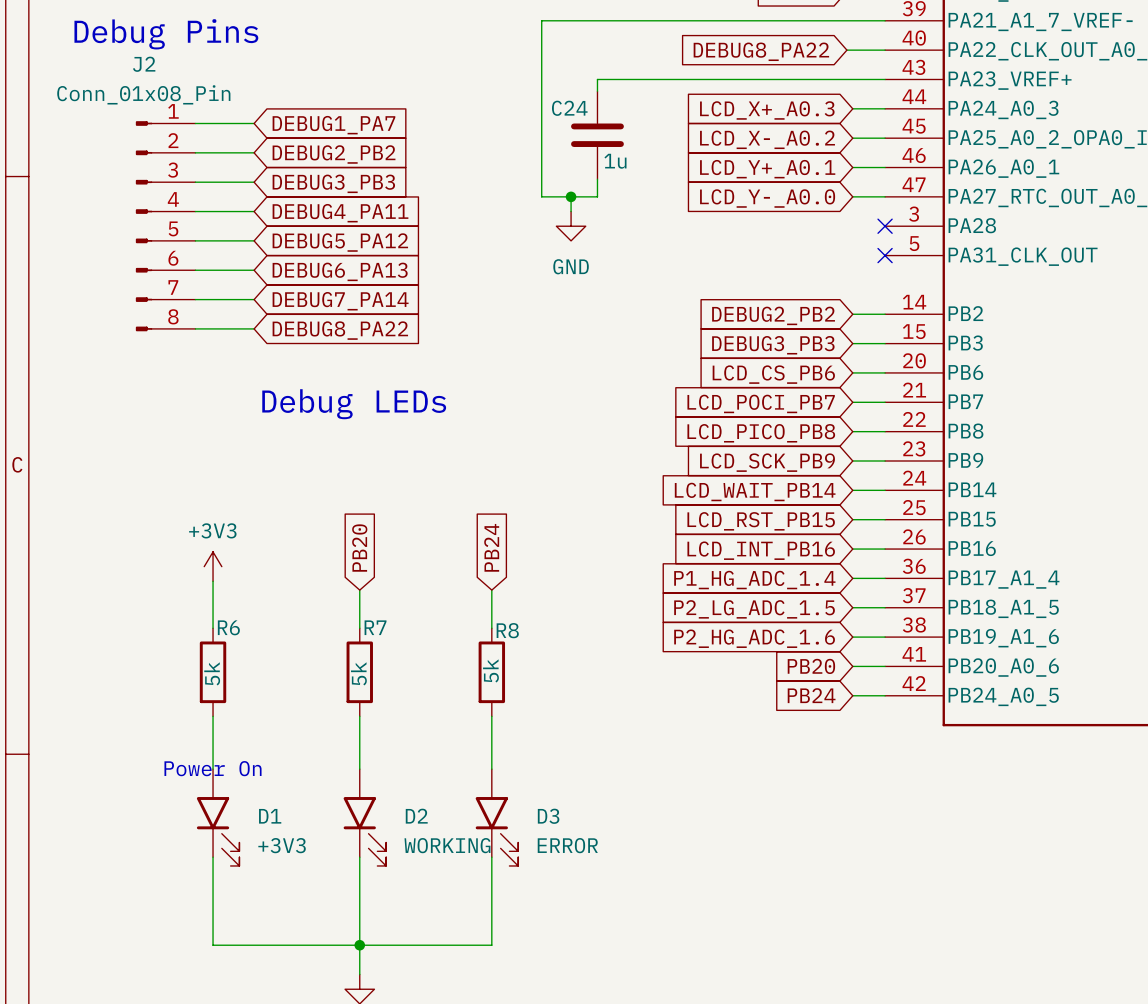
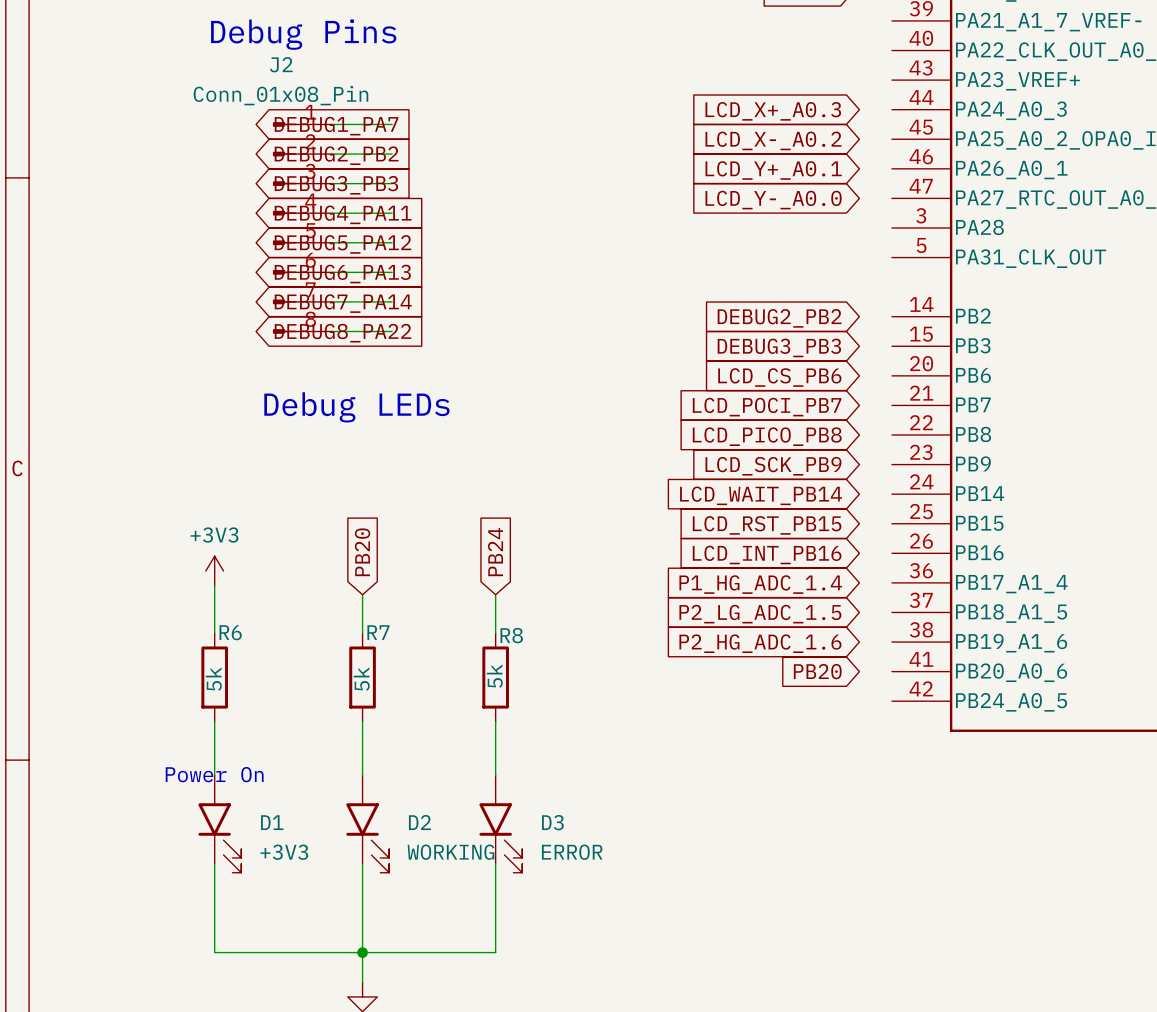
wire: (885, 20) (541, 20) (541, 196) (597, 196) (597, 179) -> none
text position: Debug Pins (166, 34) -> Debug Pins (303, 34)
wire: (846, 50) (885, 50) -> none
global label: DEBUG8_PA22 (761, 51) -> none
wire: (885, 79) (597, 79) (597, 91) -> none
wire: (852, 108) (885, 108) -> none
wire: (195, 123) (254, 123) -> (332, 124) (392, 124)
C24: 1u (597, 135) -> none
wire: (852, 138) (885, 138) -> none
wire: (195, 152) (254, 152) -> (332, 154) (392, 154)
wire: (852, 167) (885, 167) -> none
wire: (195, 182) (254, 182) -> (332, 183) (392, 183)
wire: (571, 196) (571, 211) -> none
junction: (571, 196) -> none
wire: (852, 196) (885, 196) -> none
wire: (195, 211) (254, 211) -> (332, 213) (392, 213)
J2 position: (165, 226) -> (302, 227)
power symbol: GND (571, 226) -> none
no-connect mark: (885, 226) -> none
wire: (195, 240) (254, 240) -> (332, 242) (392, 242)
no-connect mark: (885, 255) -> none
wire: (195, 270) (254, 270) -> (332, 272) (392, 272)
wire: (195, 299) (254, 299) -> (332, 301) (392, 301)
wire: (852, 314) (885, 314) -> none
wire: (195, 328) (254, 328) -> (332, 331) (392, 331)
wire: (852, 343) (885, 343) -> none
wire: (852, 372) (885, 372) -> none
wire: (852, 402) (885, 402) -> none
wire: (852, 431) (885, 431) -> none
wire: (852, 460) (885, 460) -> none
wire: (852, 490) (885, 490) -> none
wire: (852, 519) (885, 519) -> none
wire: (852, 549) (885, 549) -> none
wire: (852, 578) (885, 578) -> none
wire: (852, 607) (885, 607) -> none
wire: (852, 637) (885, 637) -> none
wire: (852, 666) (885, 666) -> none
global label: PB24 (811, 695) -> none
wire: (852, 695) (885, 695) -> none

